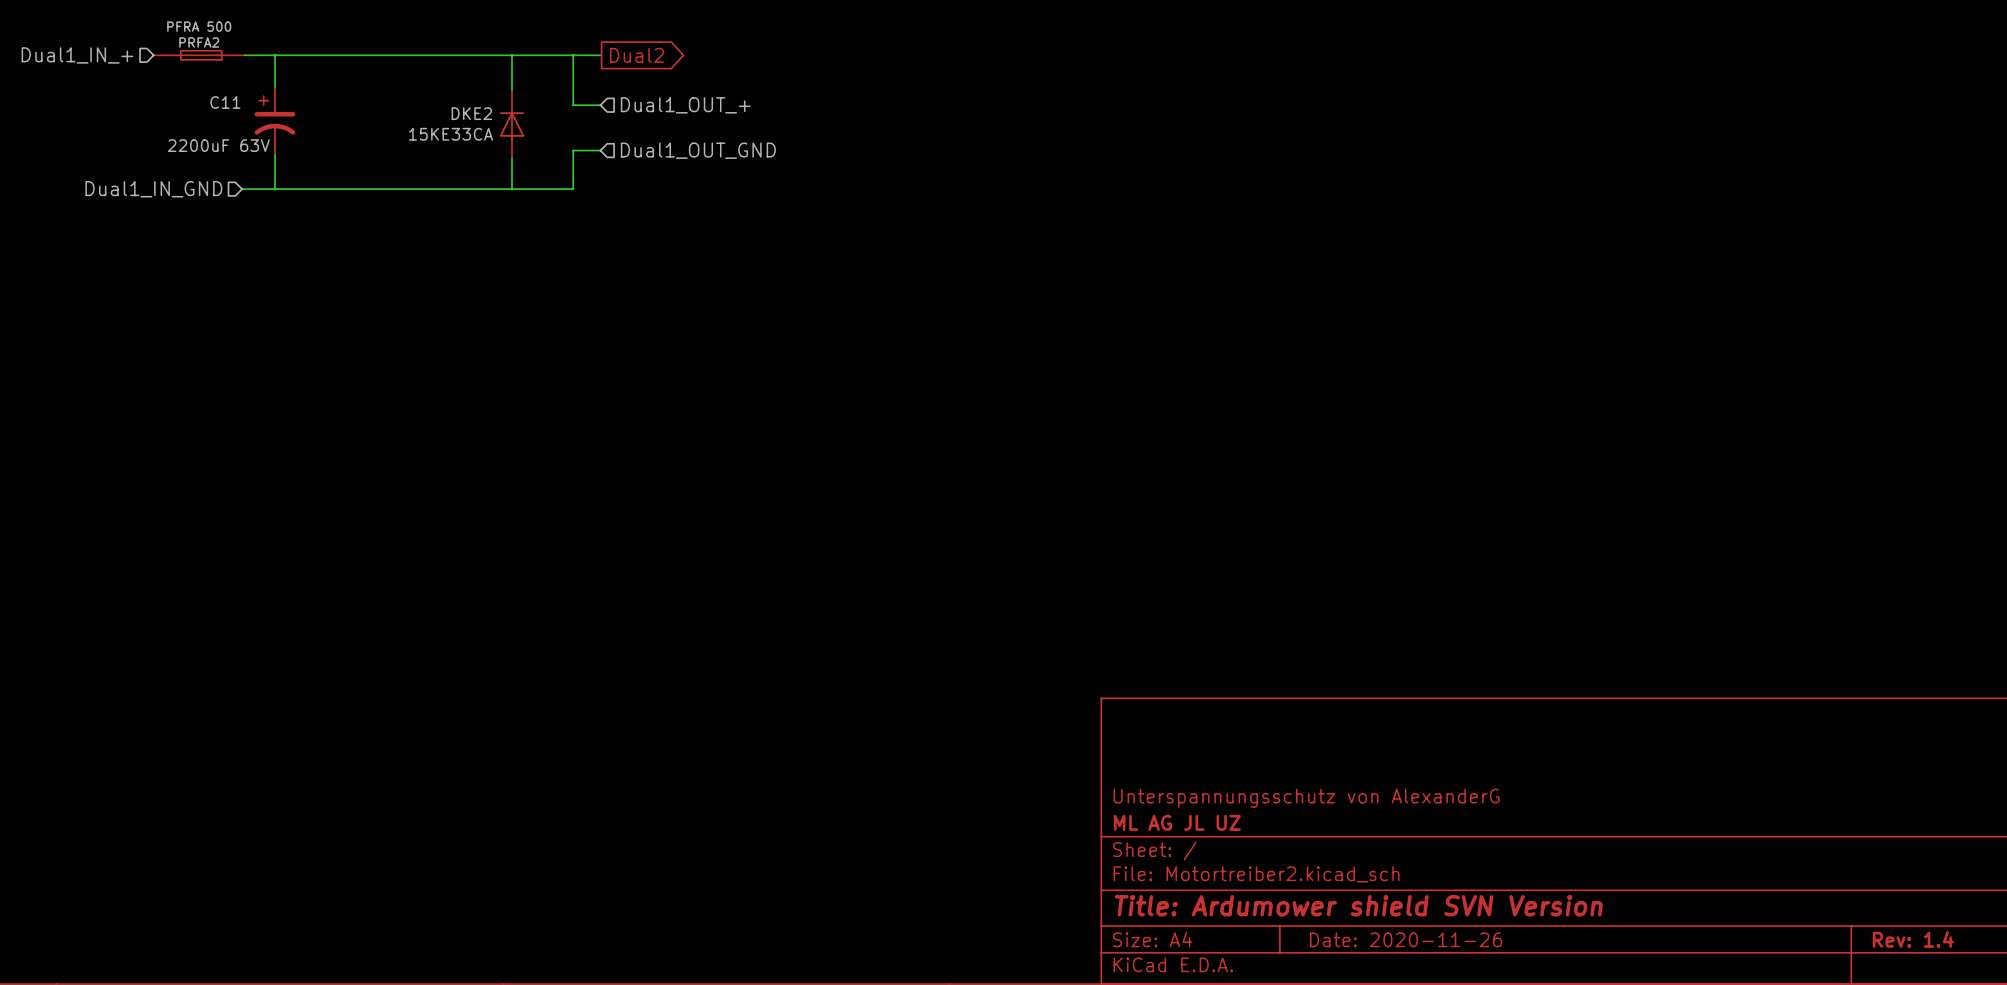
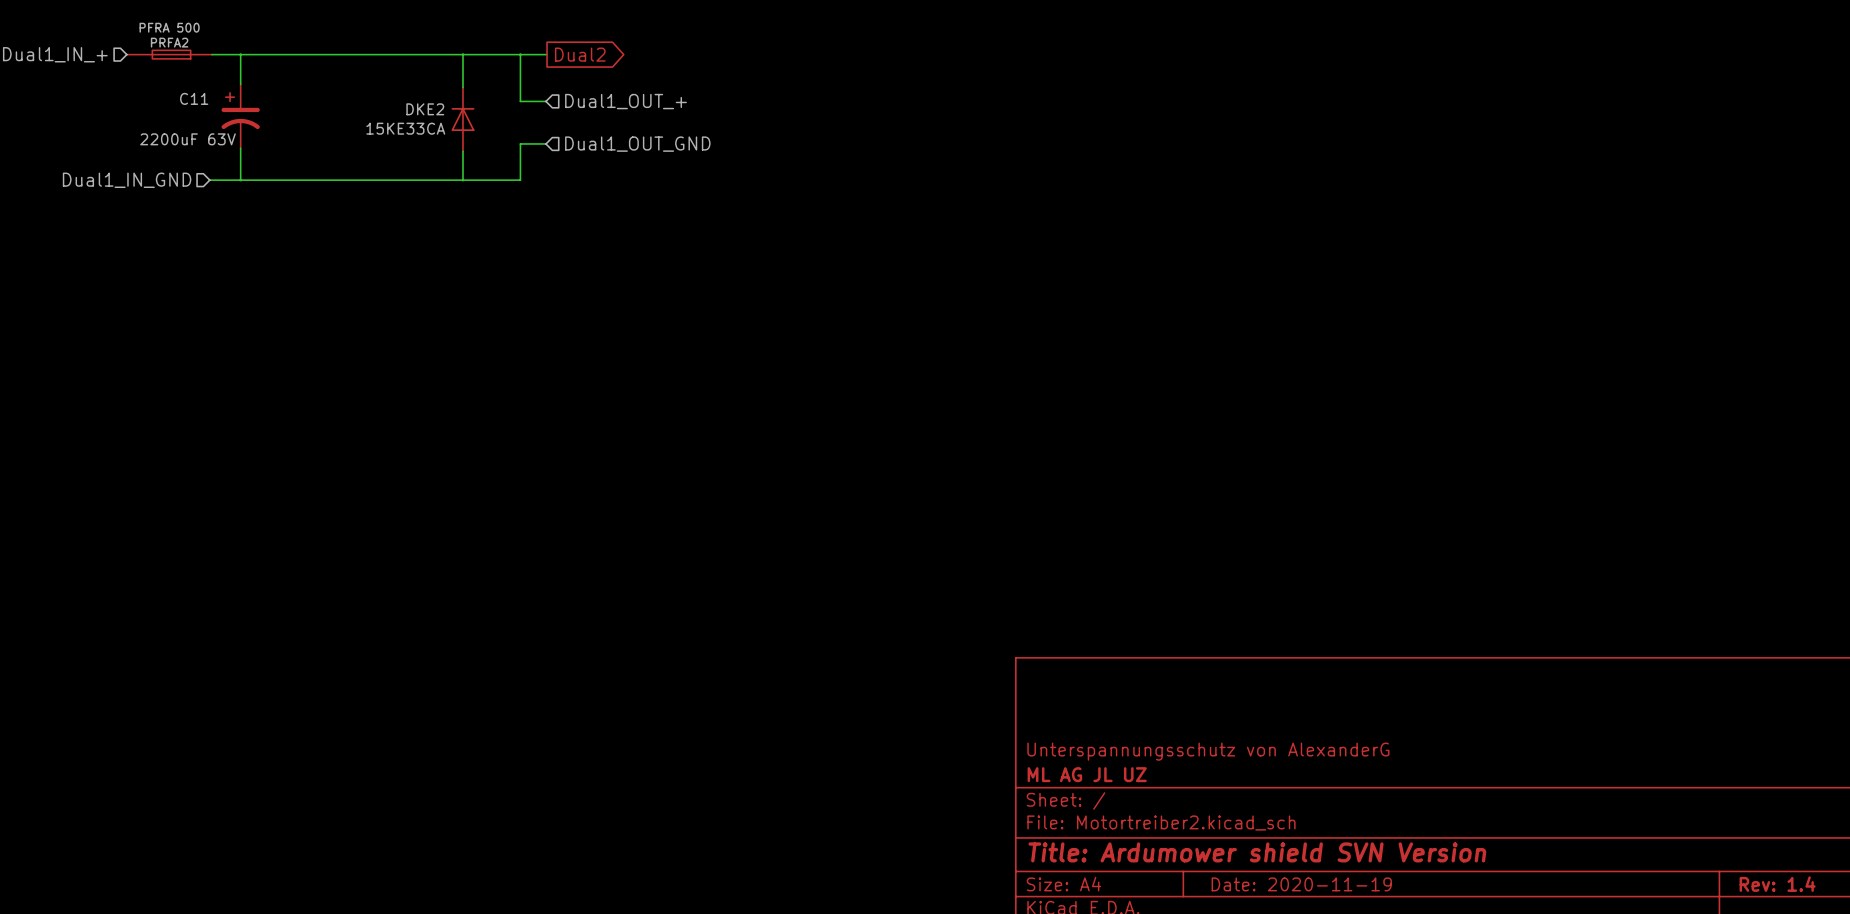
title block: Date: 2020-11-26 (1406, 939) -> Date: 2020-11-19 (1301, 884)

